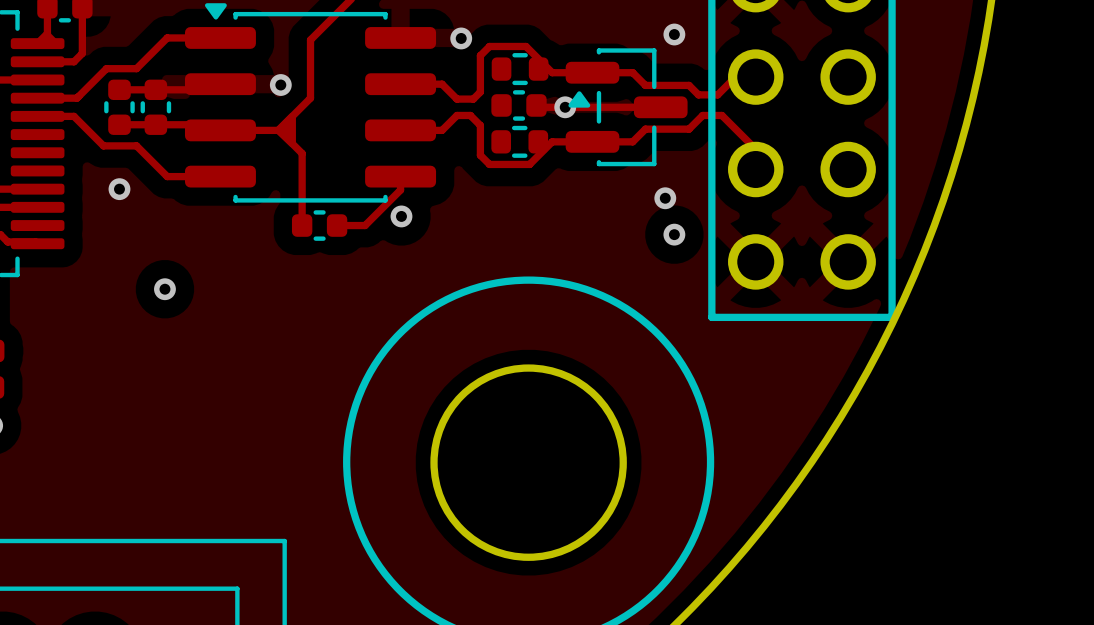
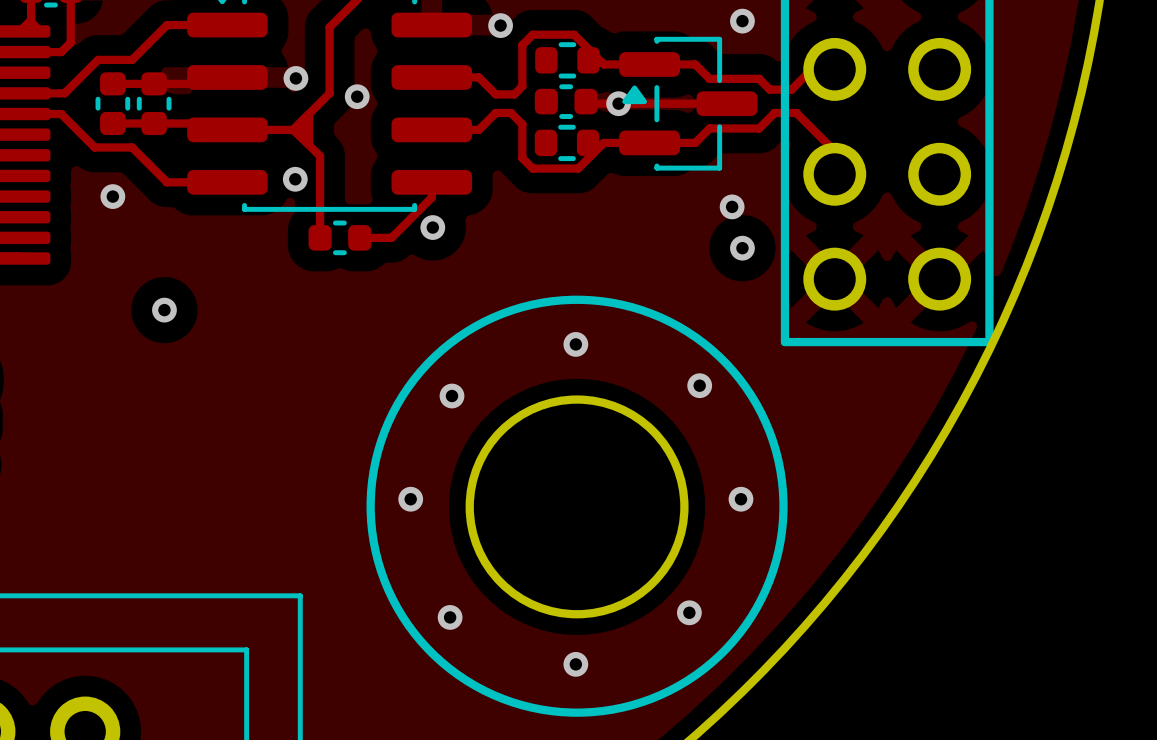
via: none -> (357, 96)
via: none -> (295, 179)
via: none -> (575, 344)
via: none -> (699, 385)
via: none -> (451, 396)
via: none -> (410, 499)
via: none -> (740, 499)
via: none -> (689, 612)
via: none -> (450, 617)
via: none -> (575, 664)

